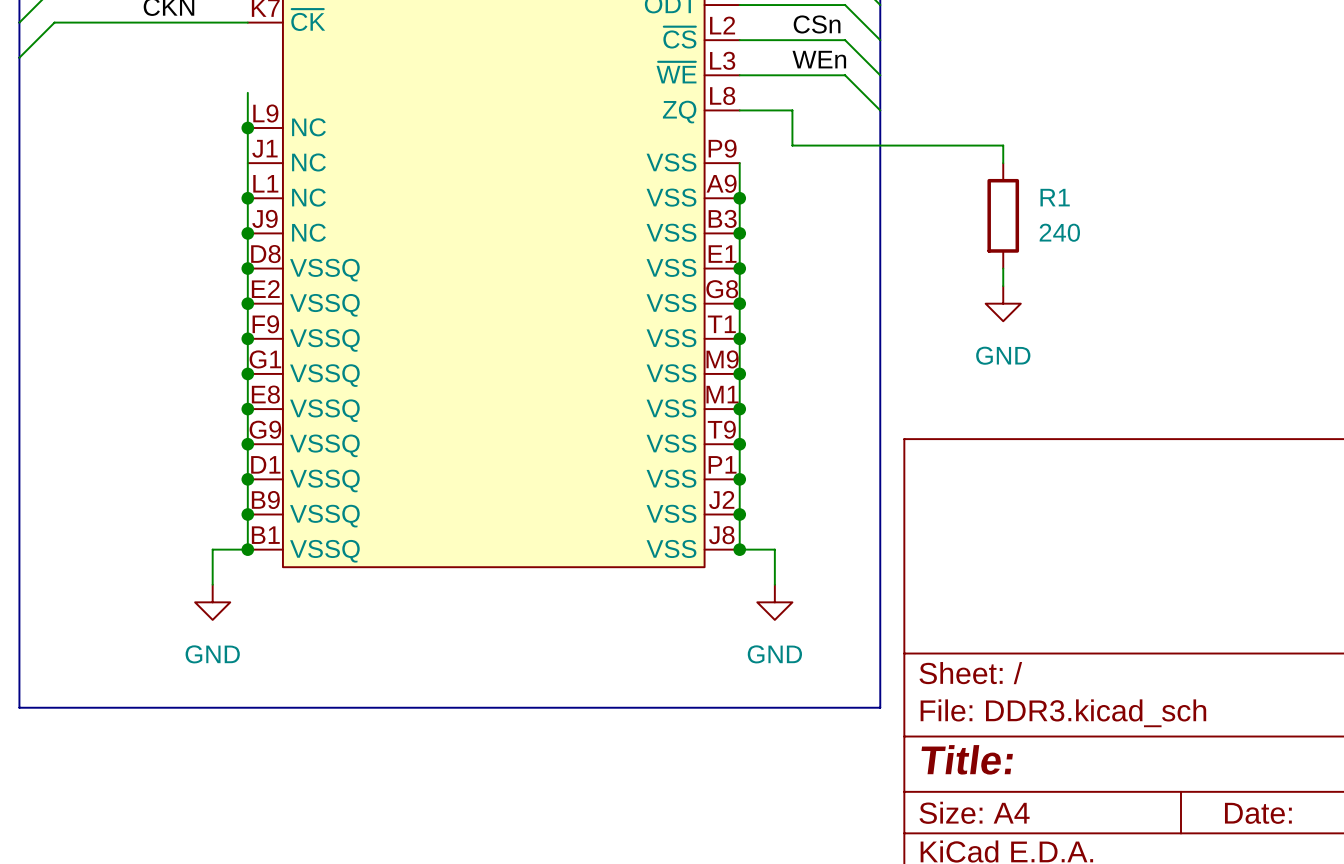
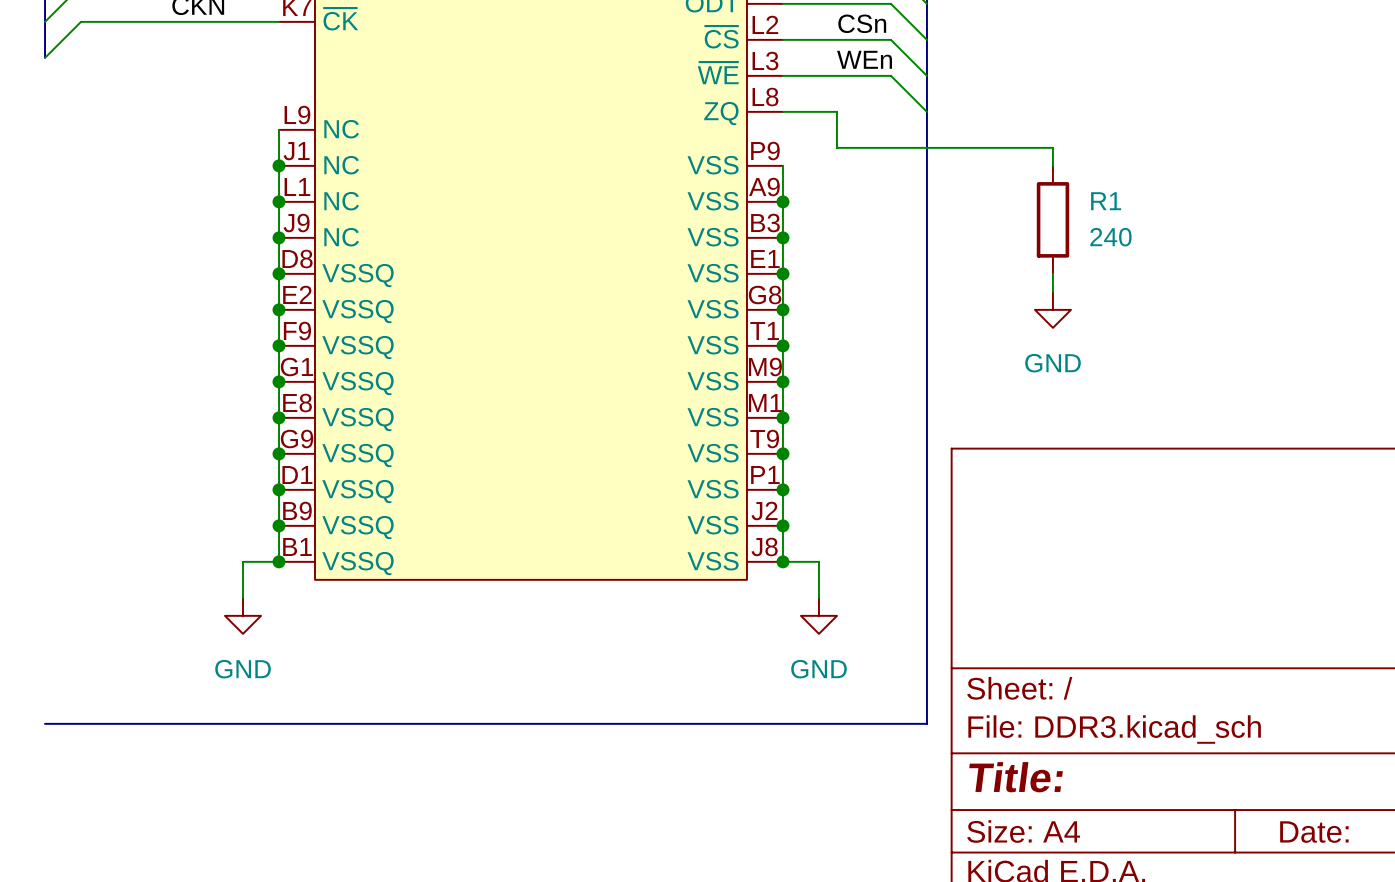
bus: (19, 57) (19, 707) -> none
wire: (247, 92) (247, 128) -> none
junction position: (247, 128) -> (279, 165)

